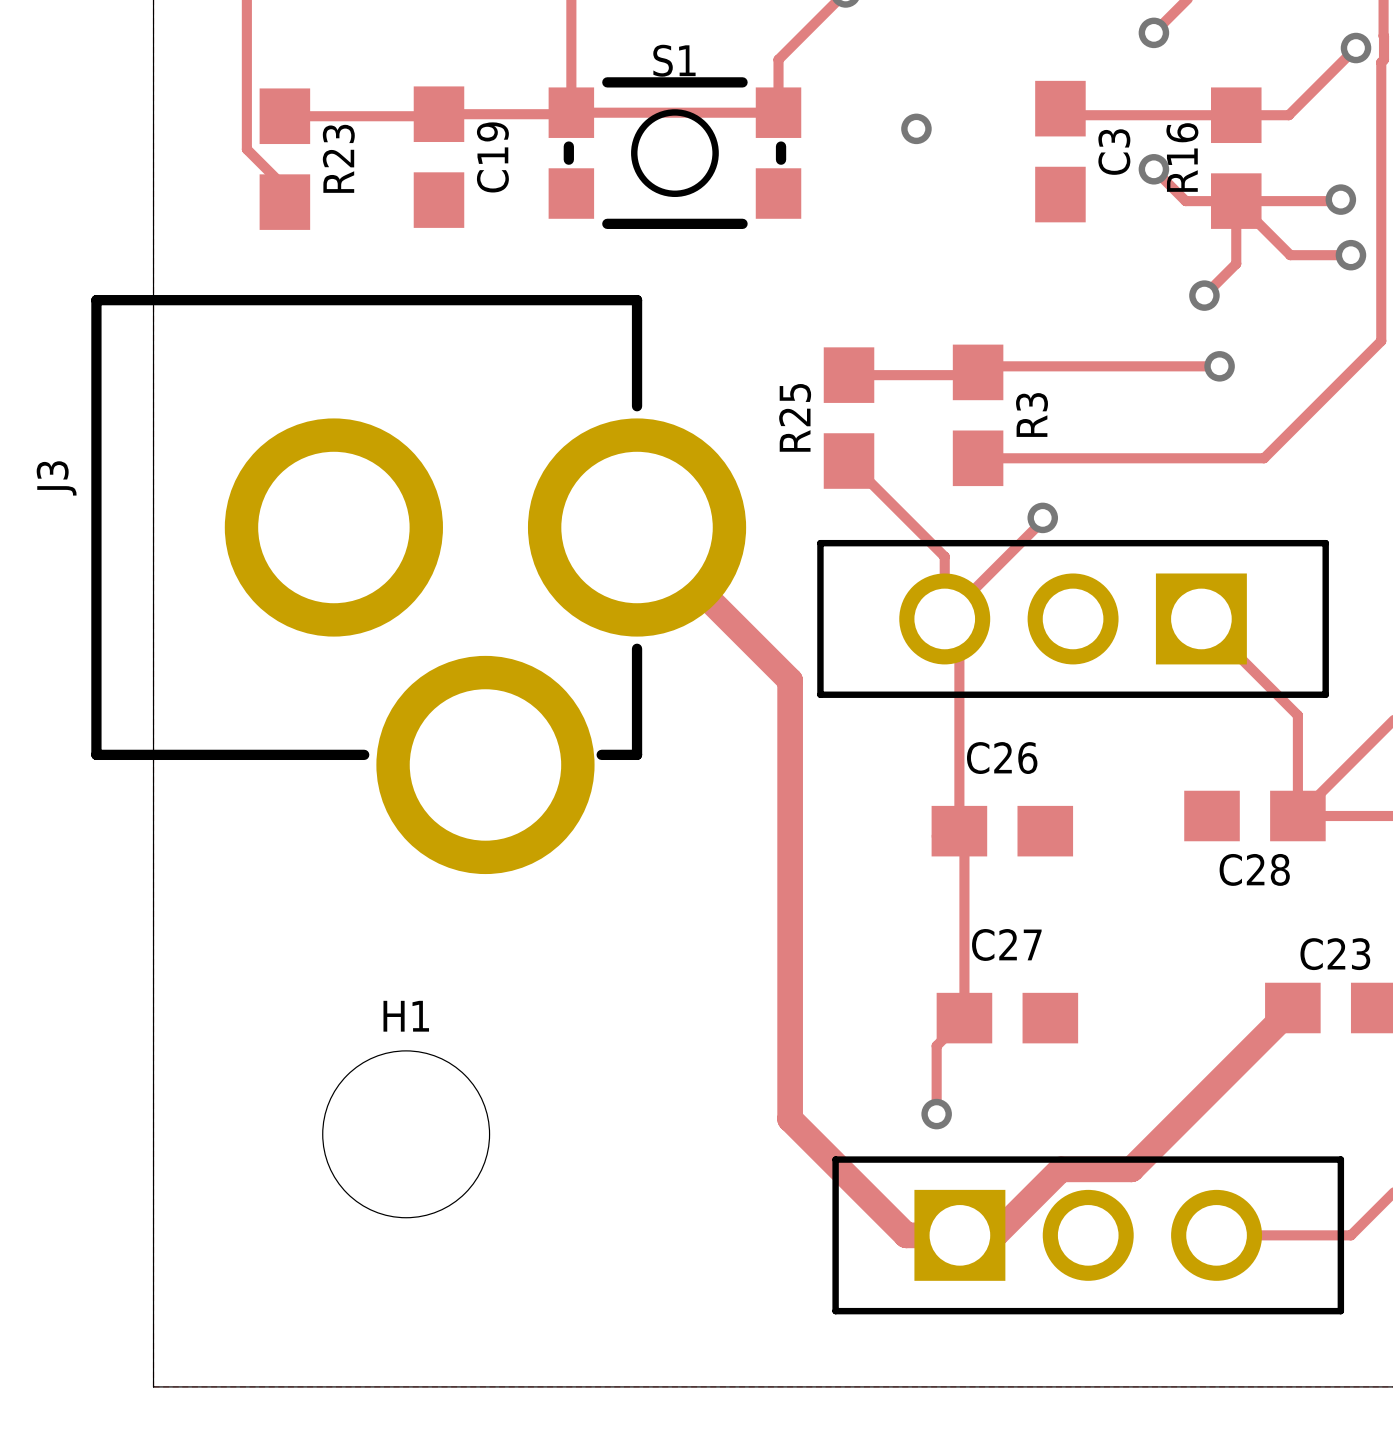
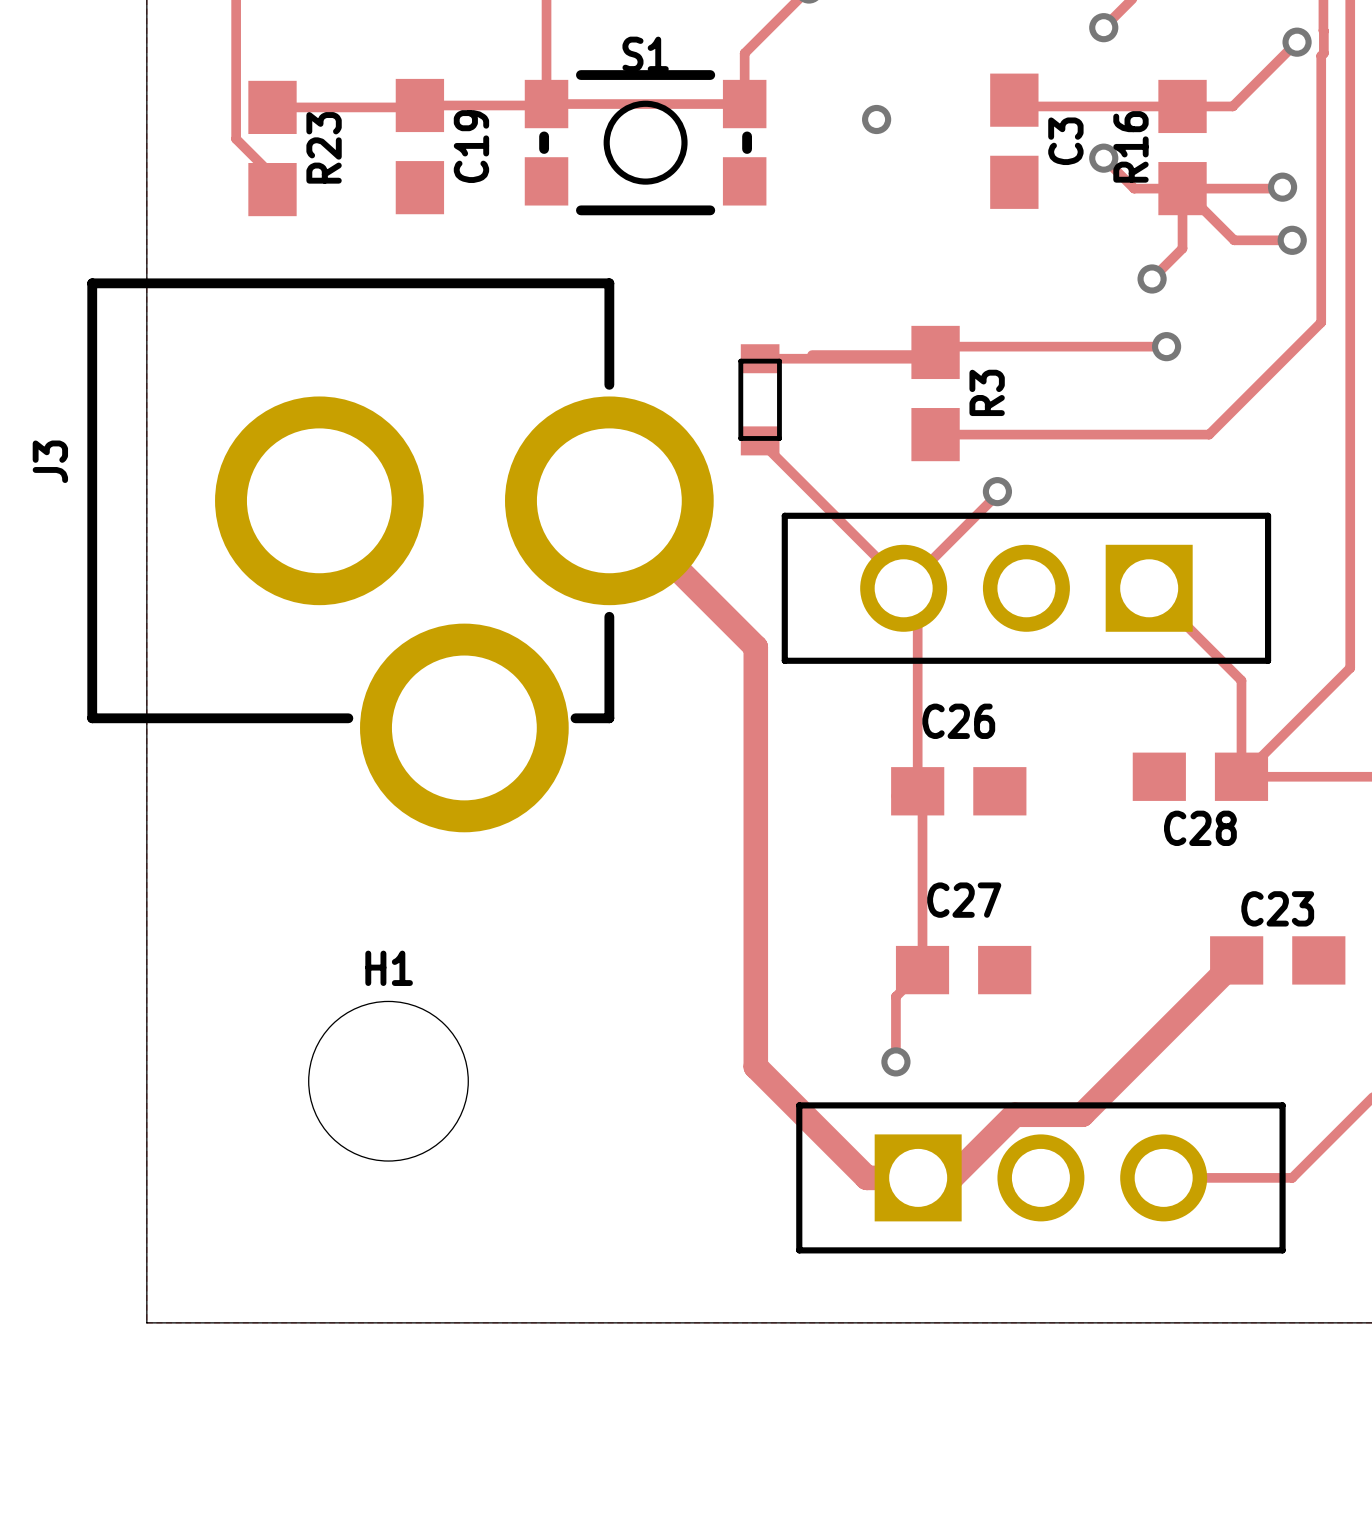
track: none -> (760, 358) (924, 358)
R25: (849, 418) -> none
part: none -> (760, 399)
track: (849, 461) (944, 556) (944, 614) -> (760, 440) (903, 584)

